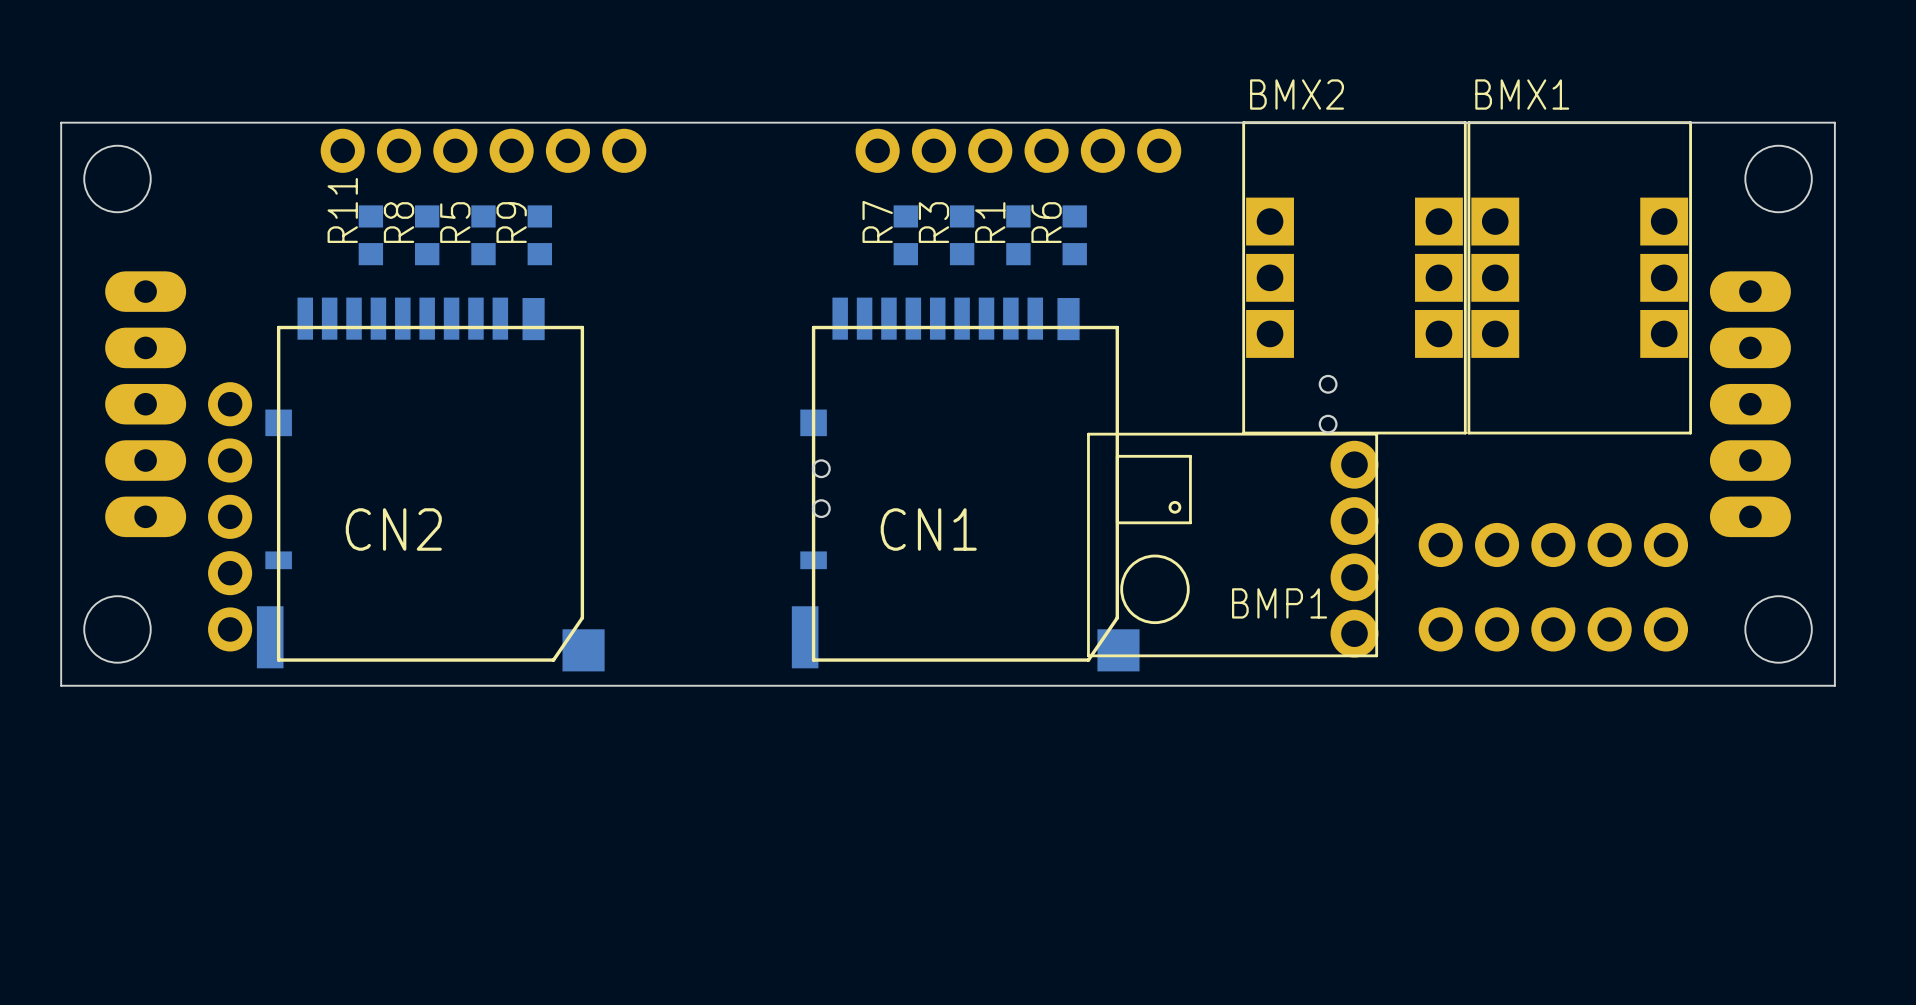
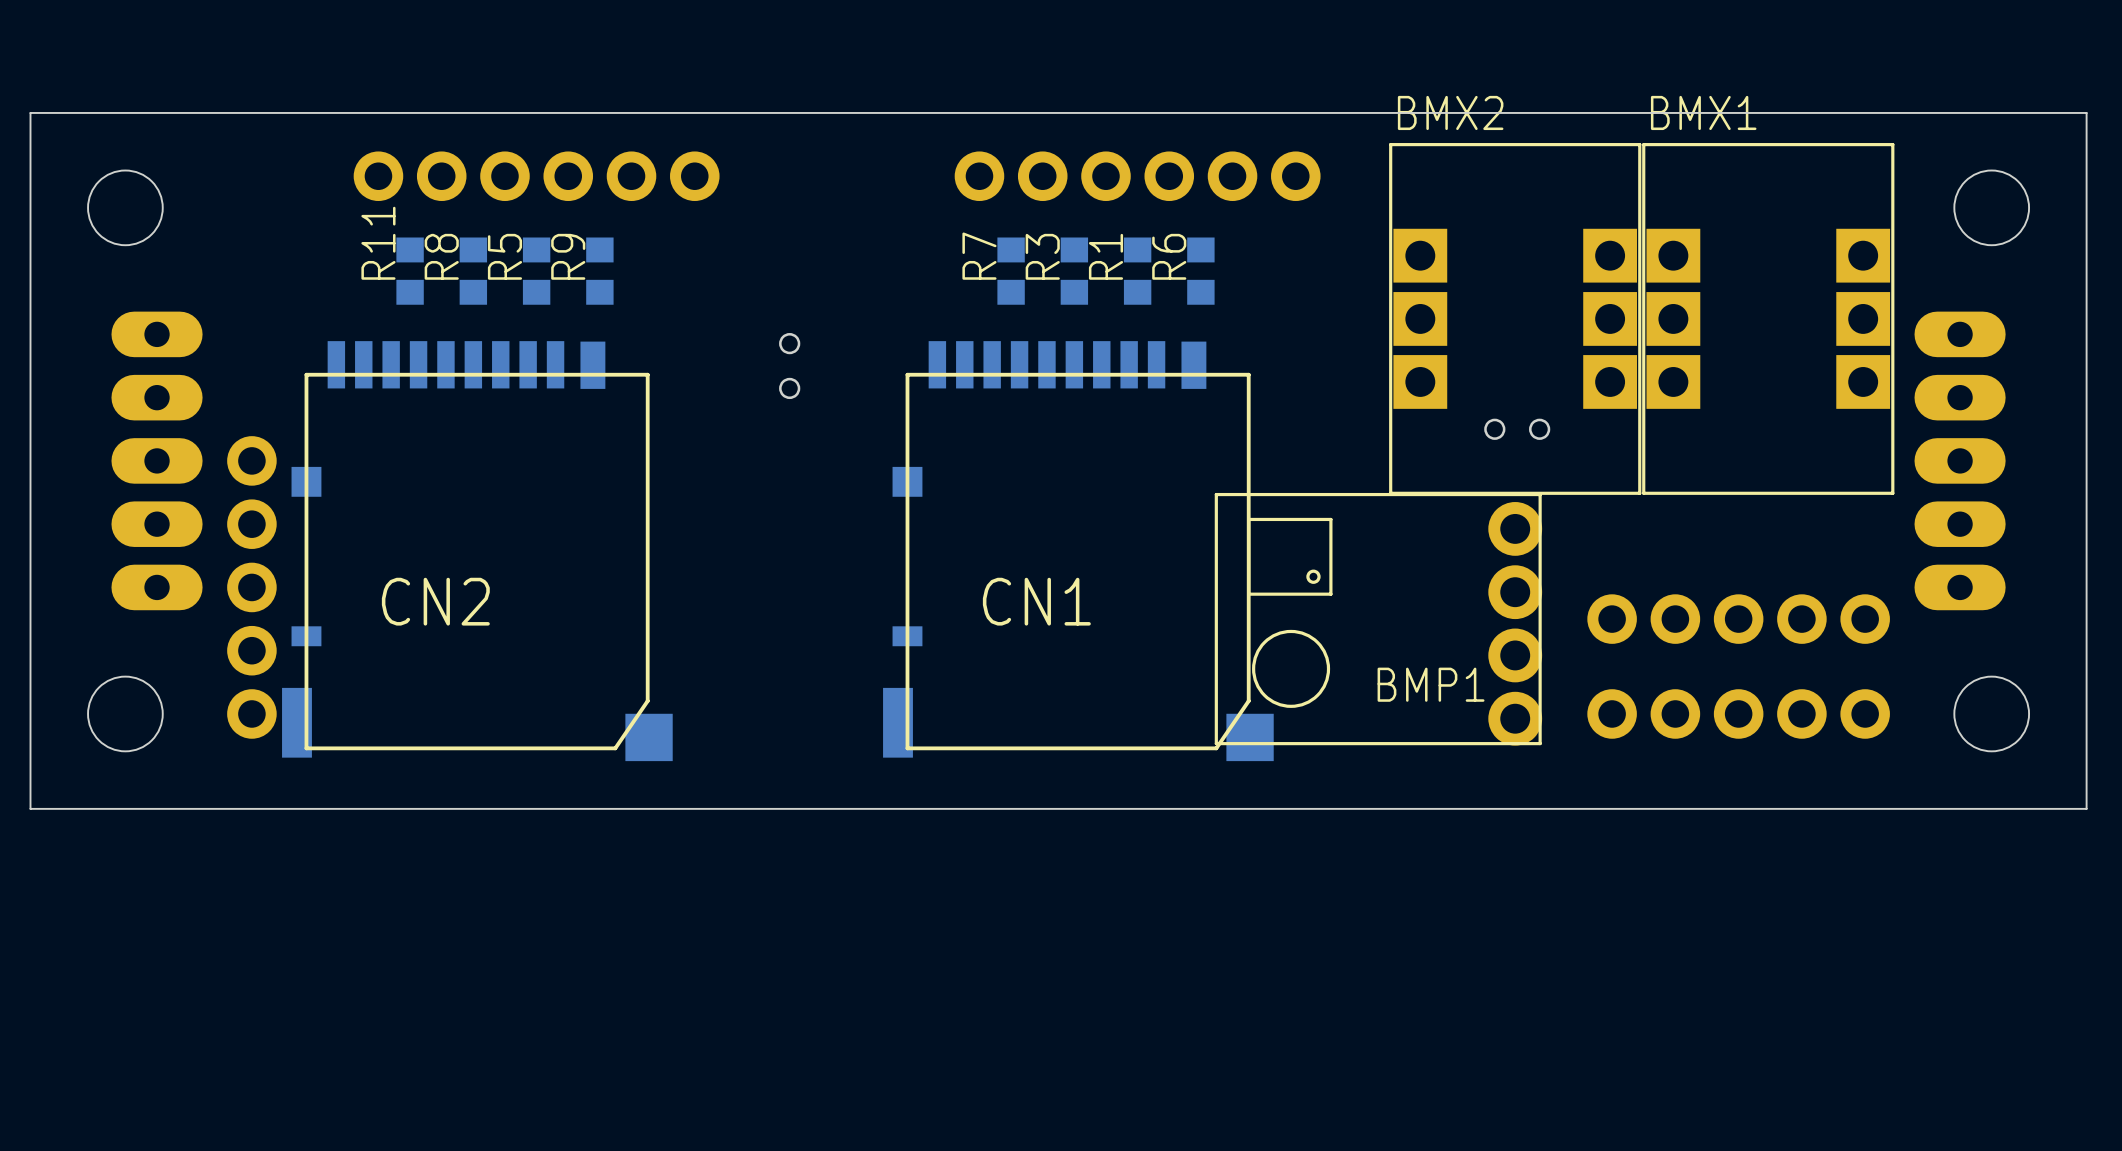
board edge: (1834, 122) (1834, 685) (61, 685) (61, 122) (1834, 122) -> (2086, 112) (2086, 808) (30, 808) (30, 112) (2086, 112)
part rotation: 0° (1328, 404) -> 90° clockwise (1517, 429)
part position: (1328, 404) -> (1517, 429)
part position: (821, 488) -> (789, 366)

